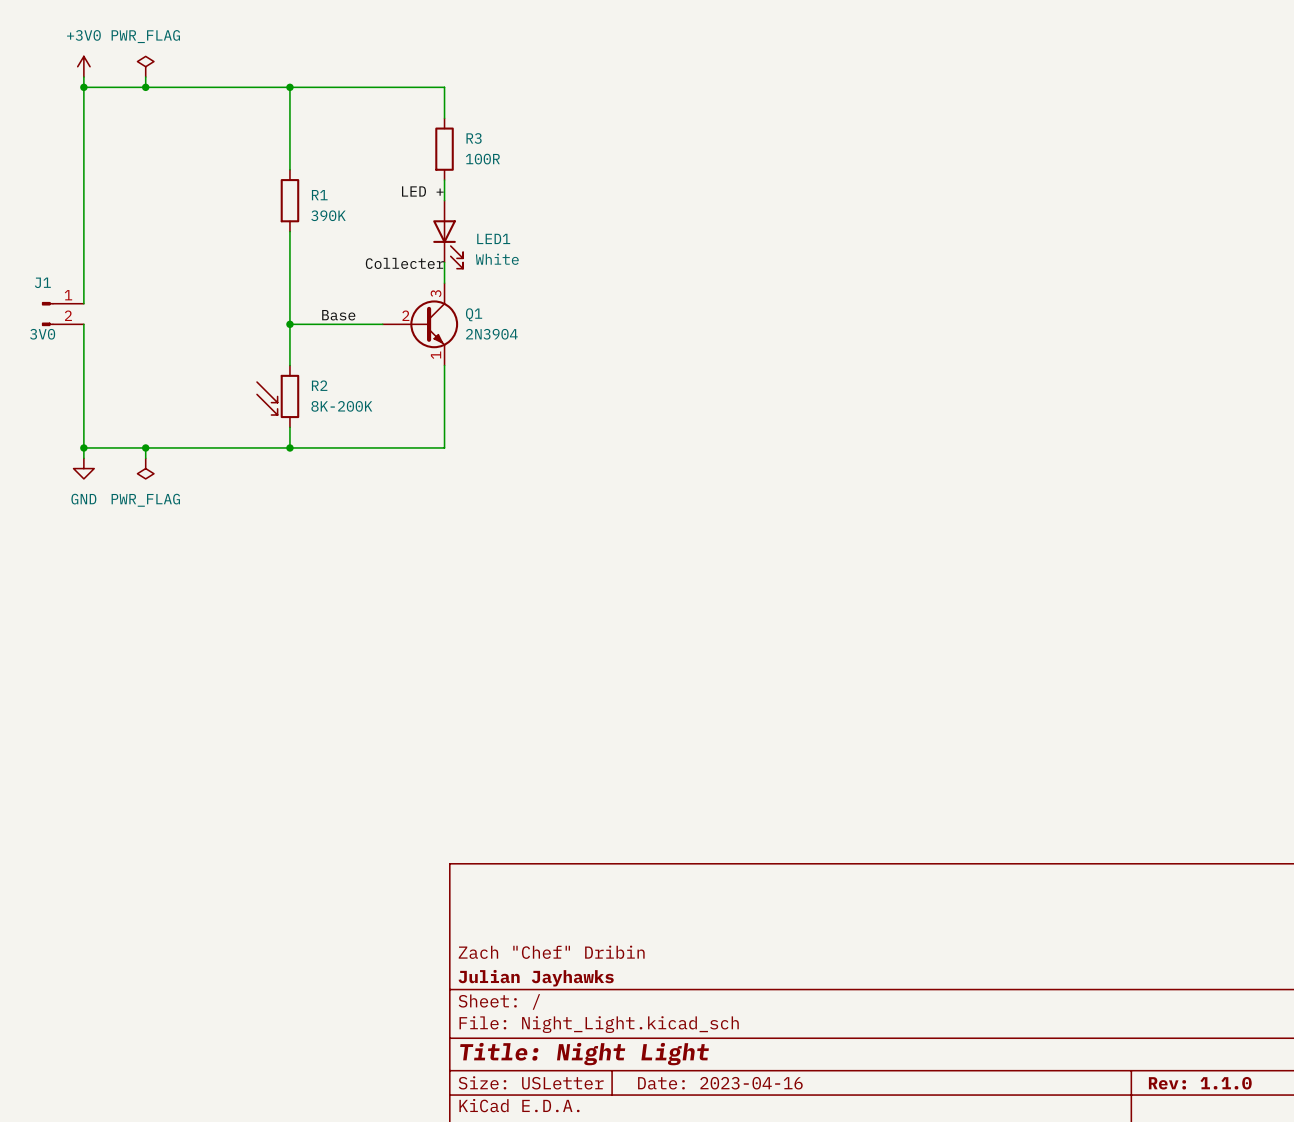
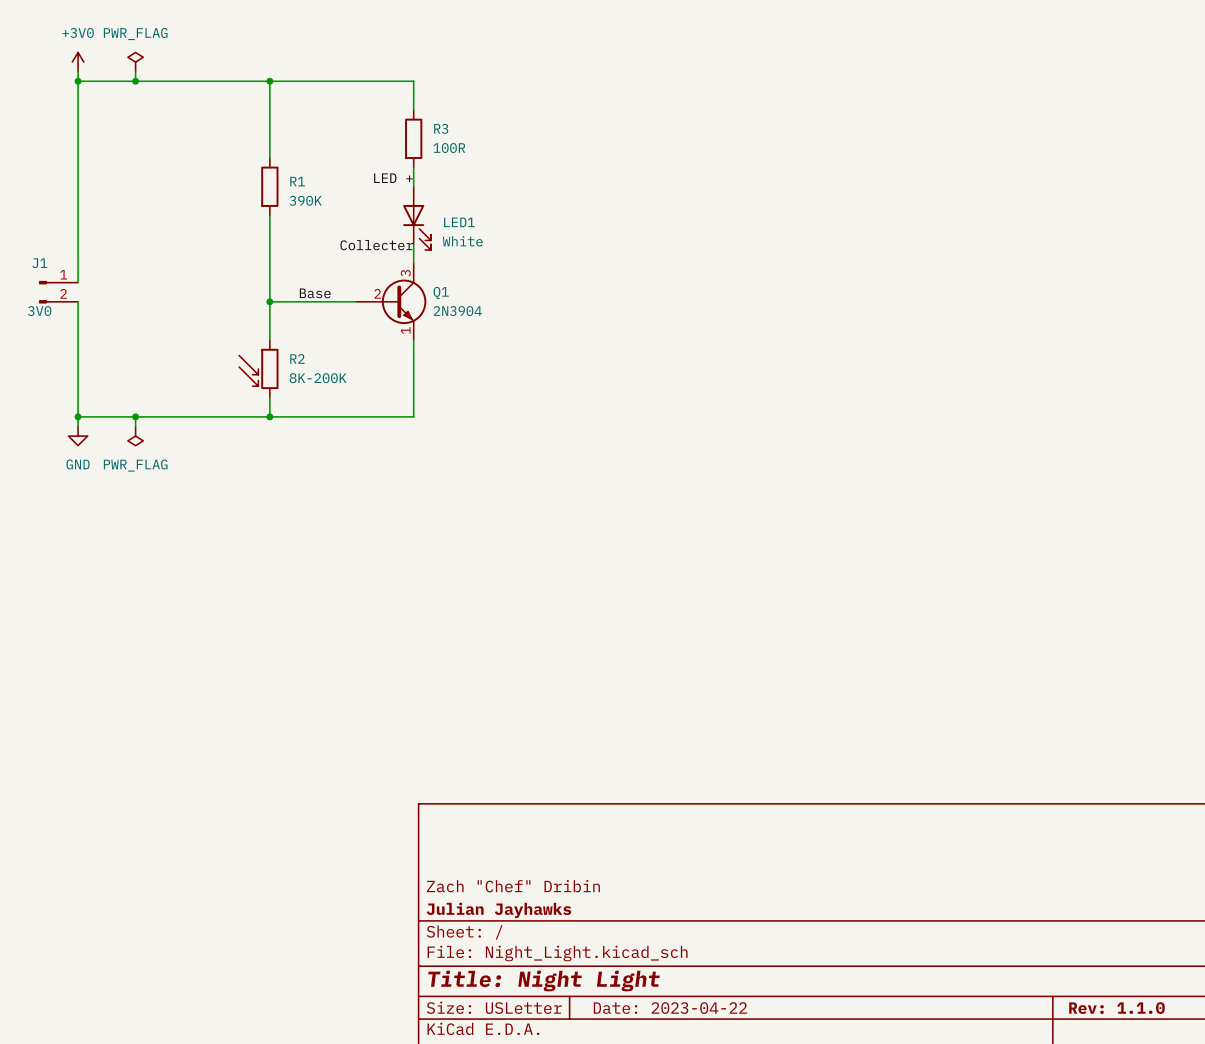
title block: Date: 2023-04-16 (720, 1083) -> Date: 2023-04-22 (670, 1008)

